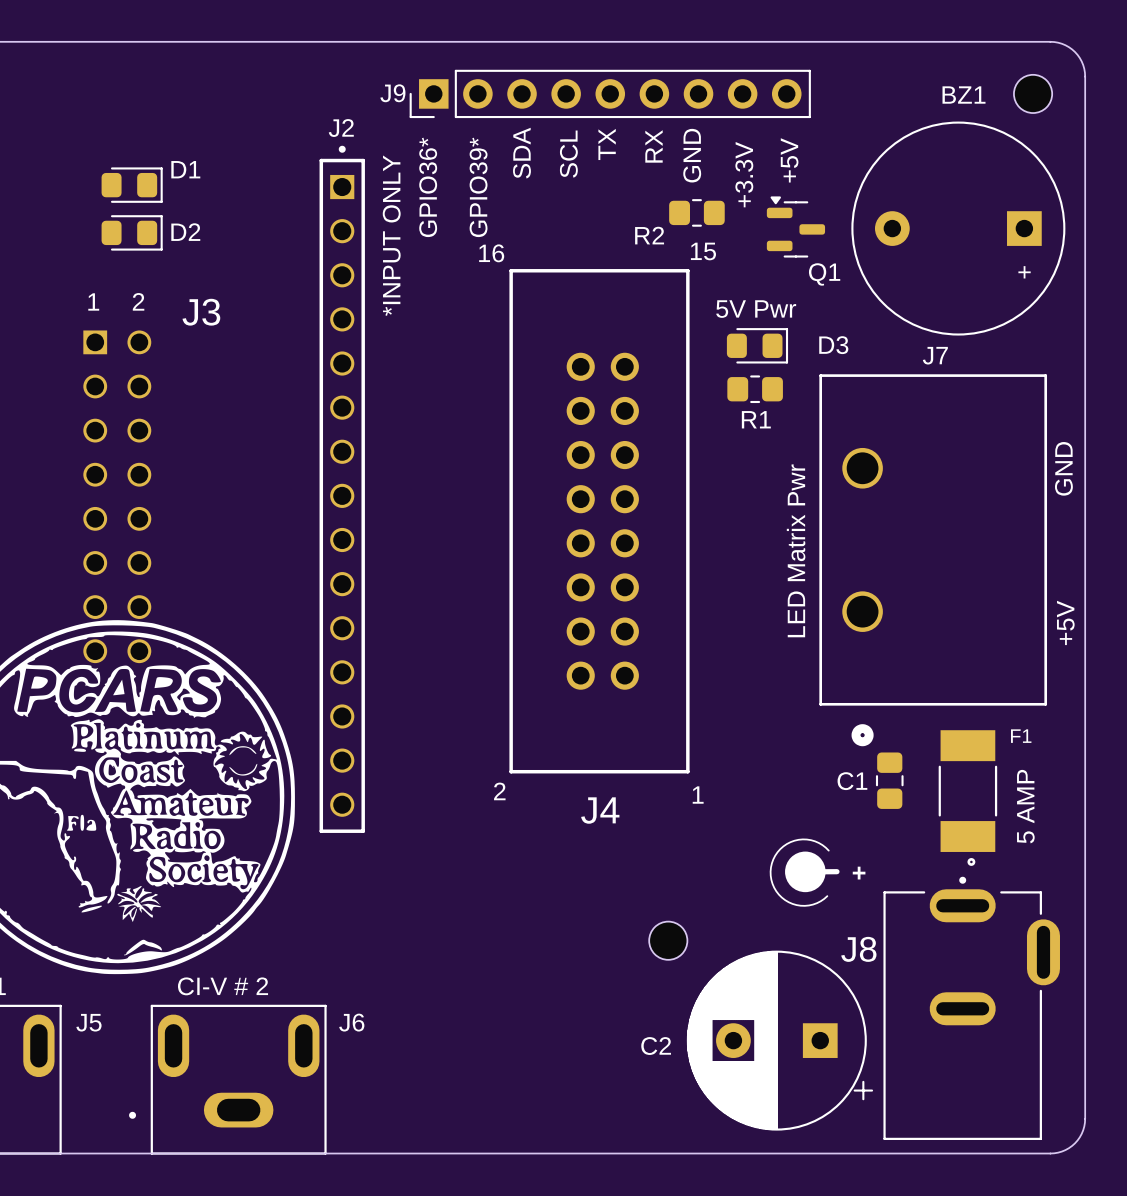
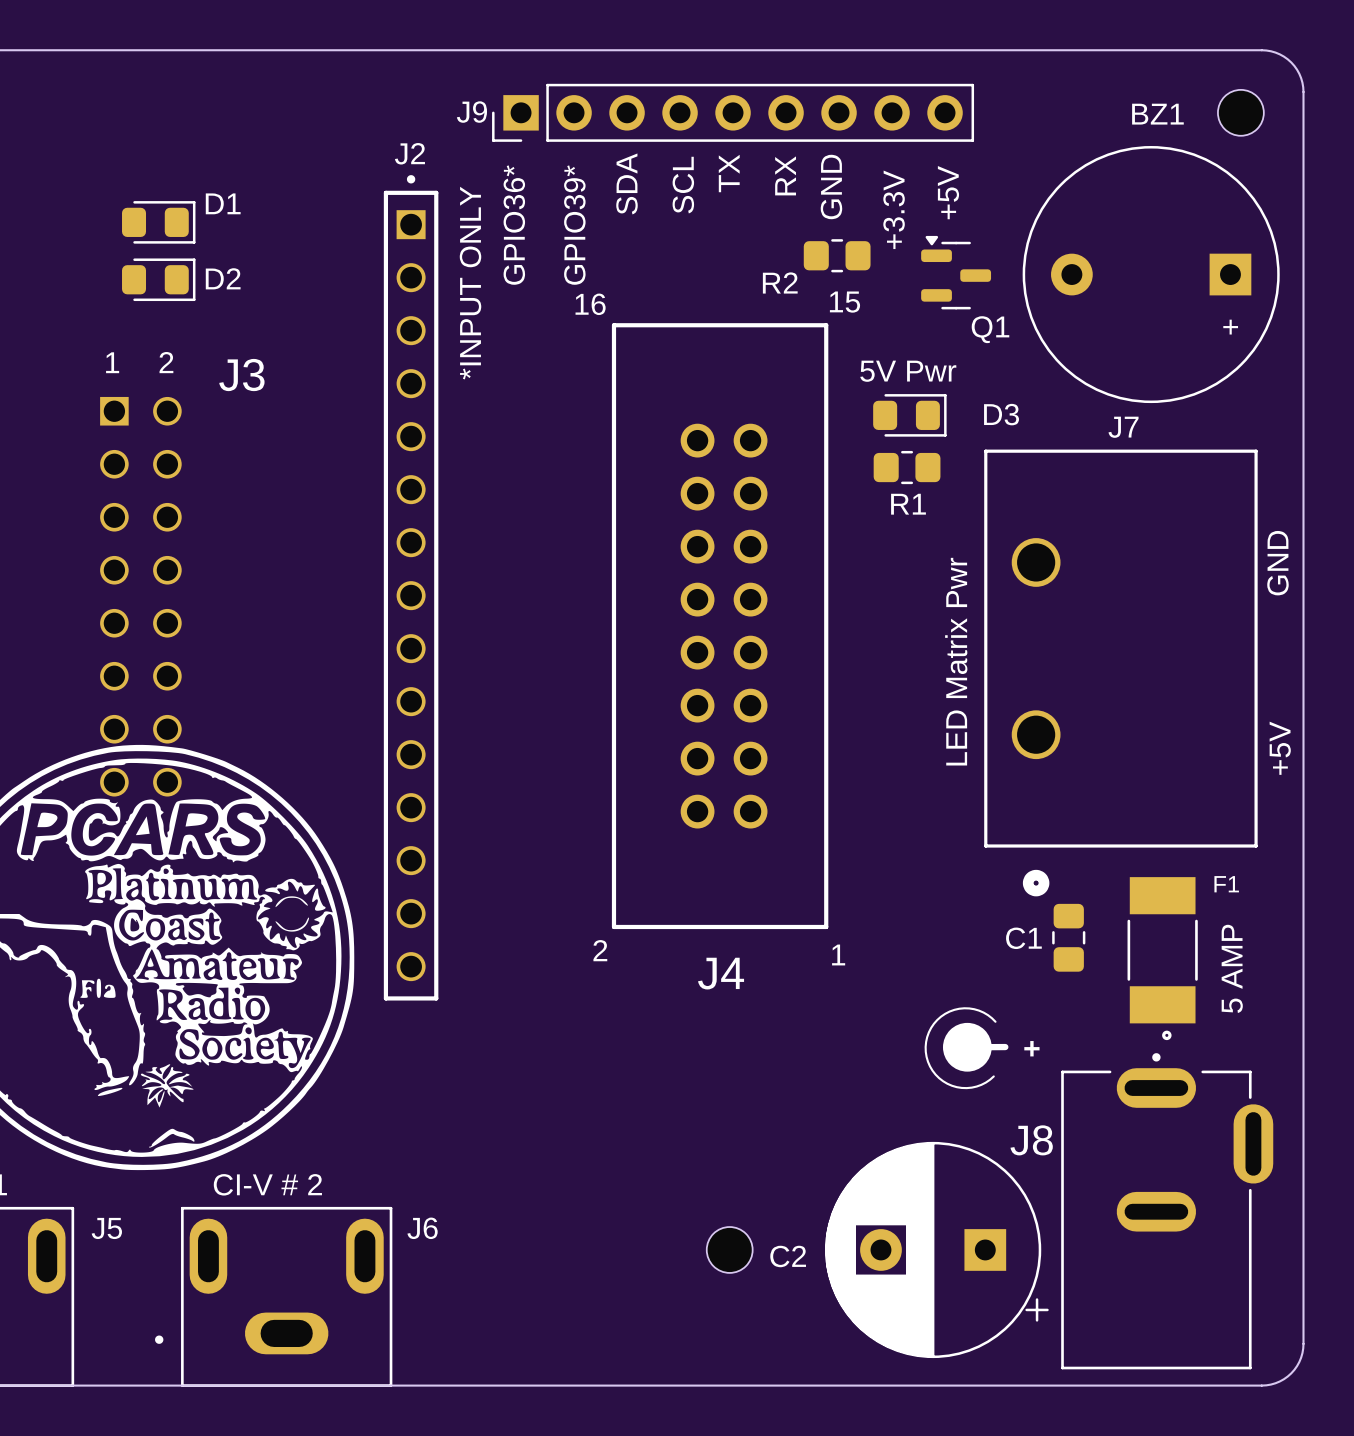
part position: (668, 940) -> (729, 1249)

